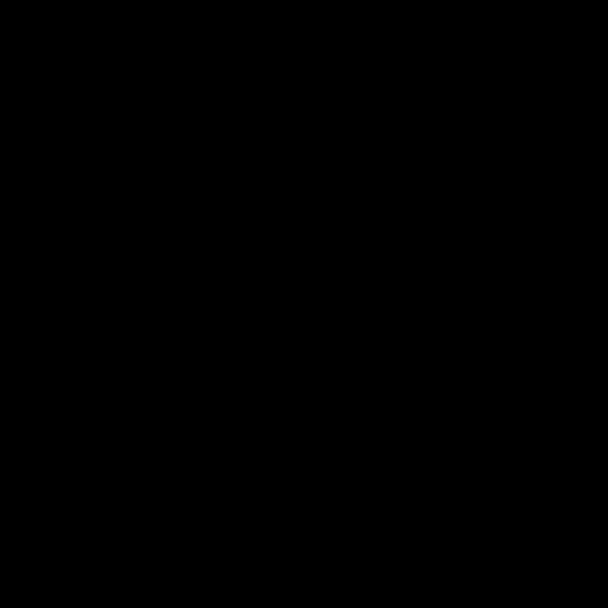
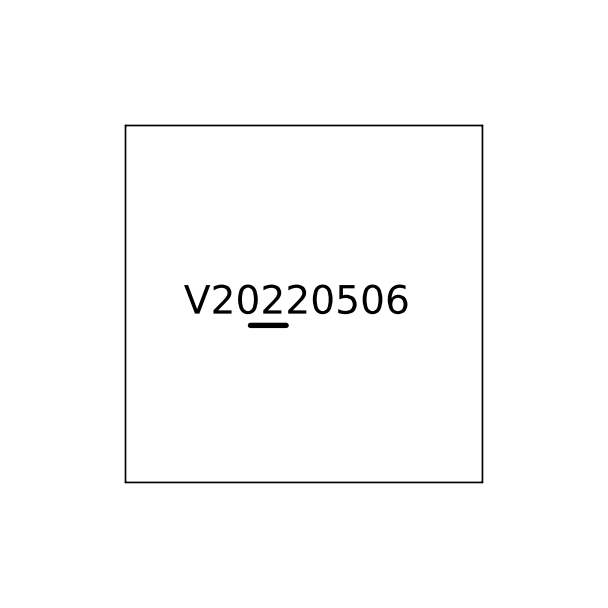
board edge: none -> (125, 125) (482, 125) (482, 482) (125, 482) (125, 125)
drawing: none -> [247, 322, 289, 329]

